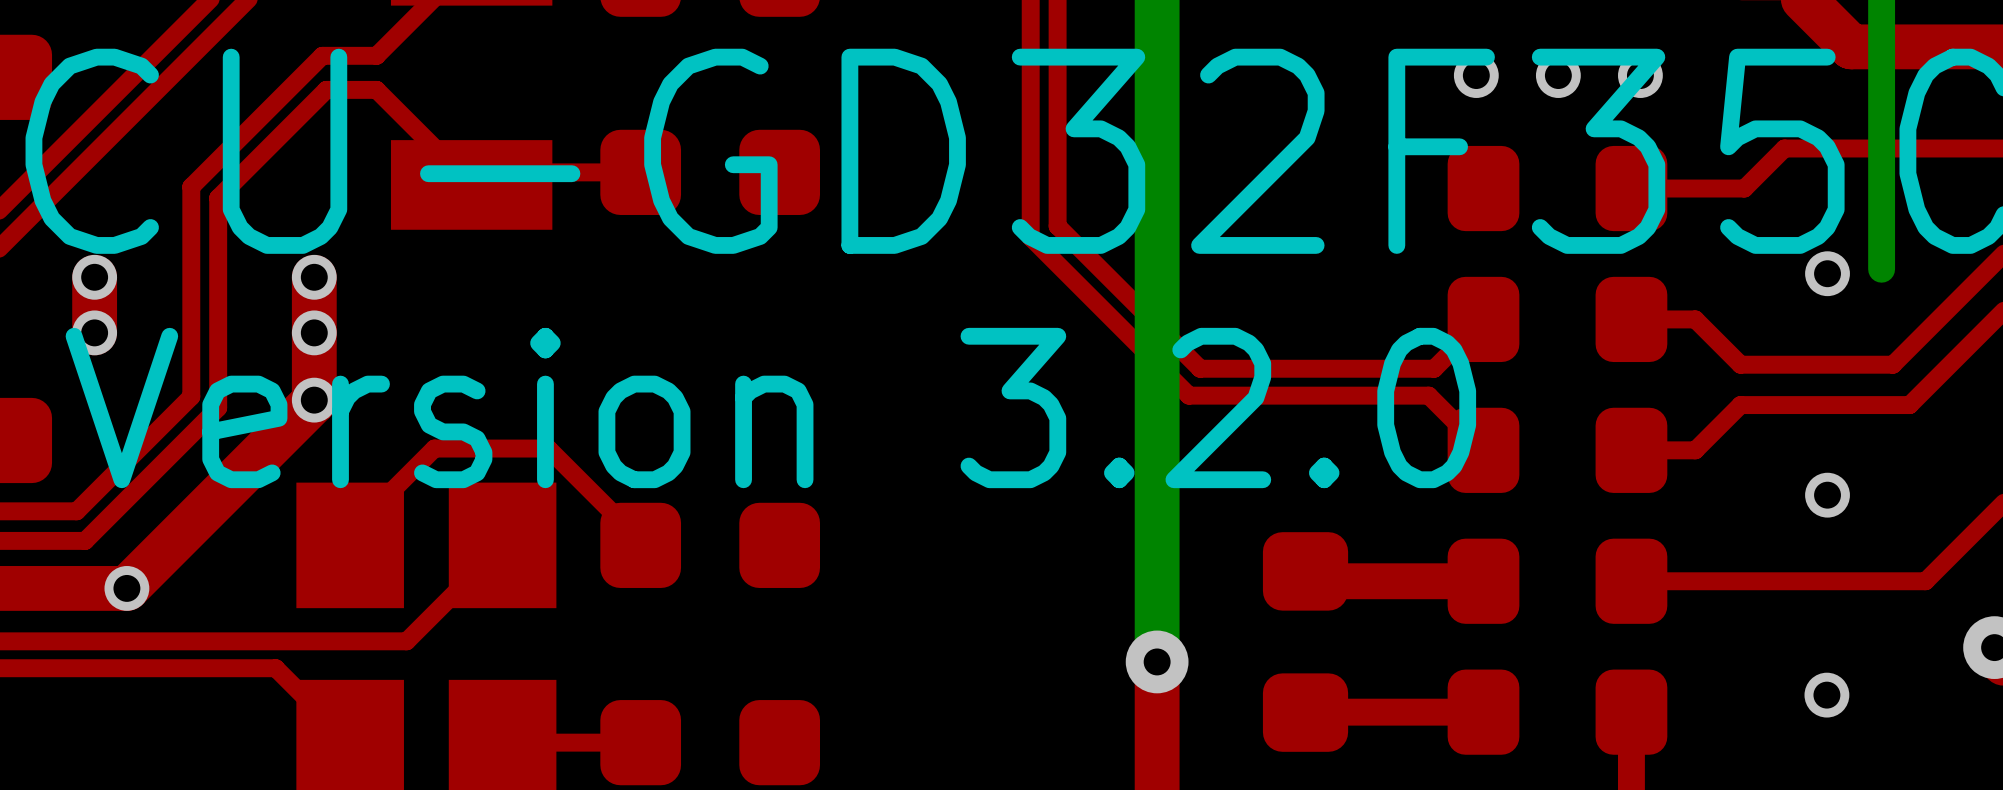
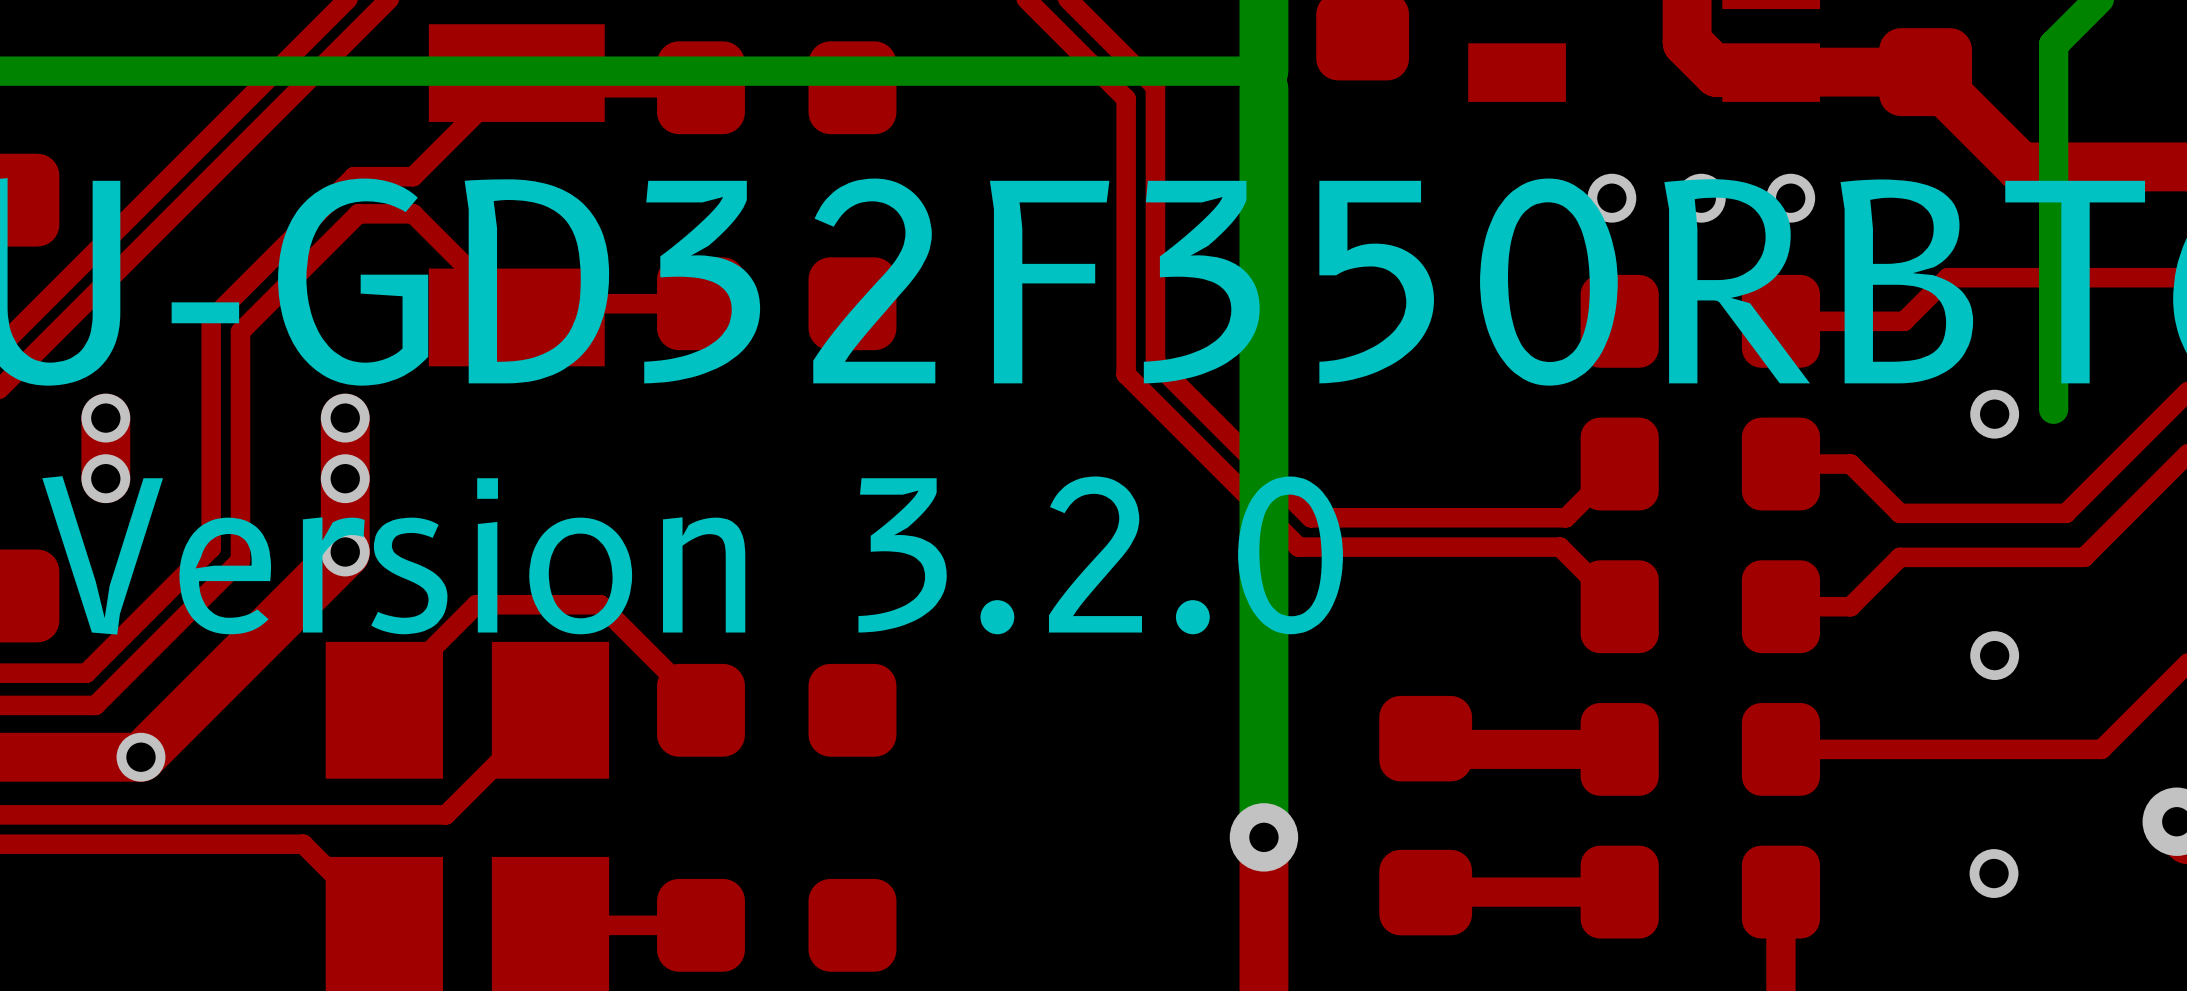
text position: Version 3.2.0 (770, 408) -> Version 3.2.0 (692, 555)

